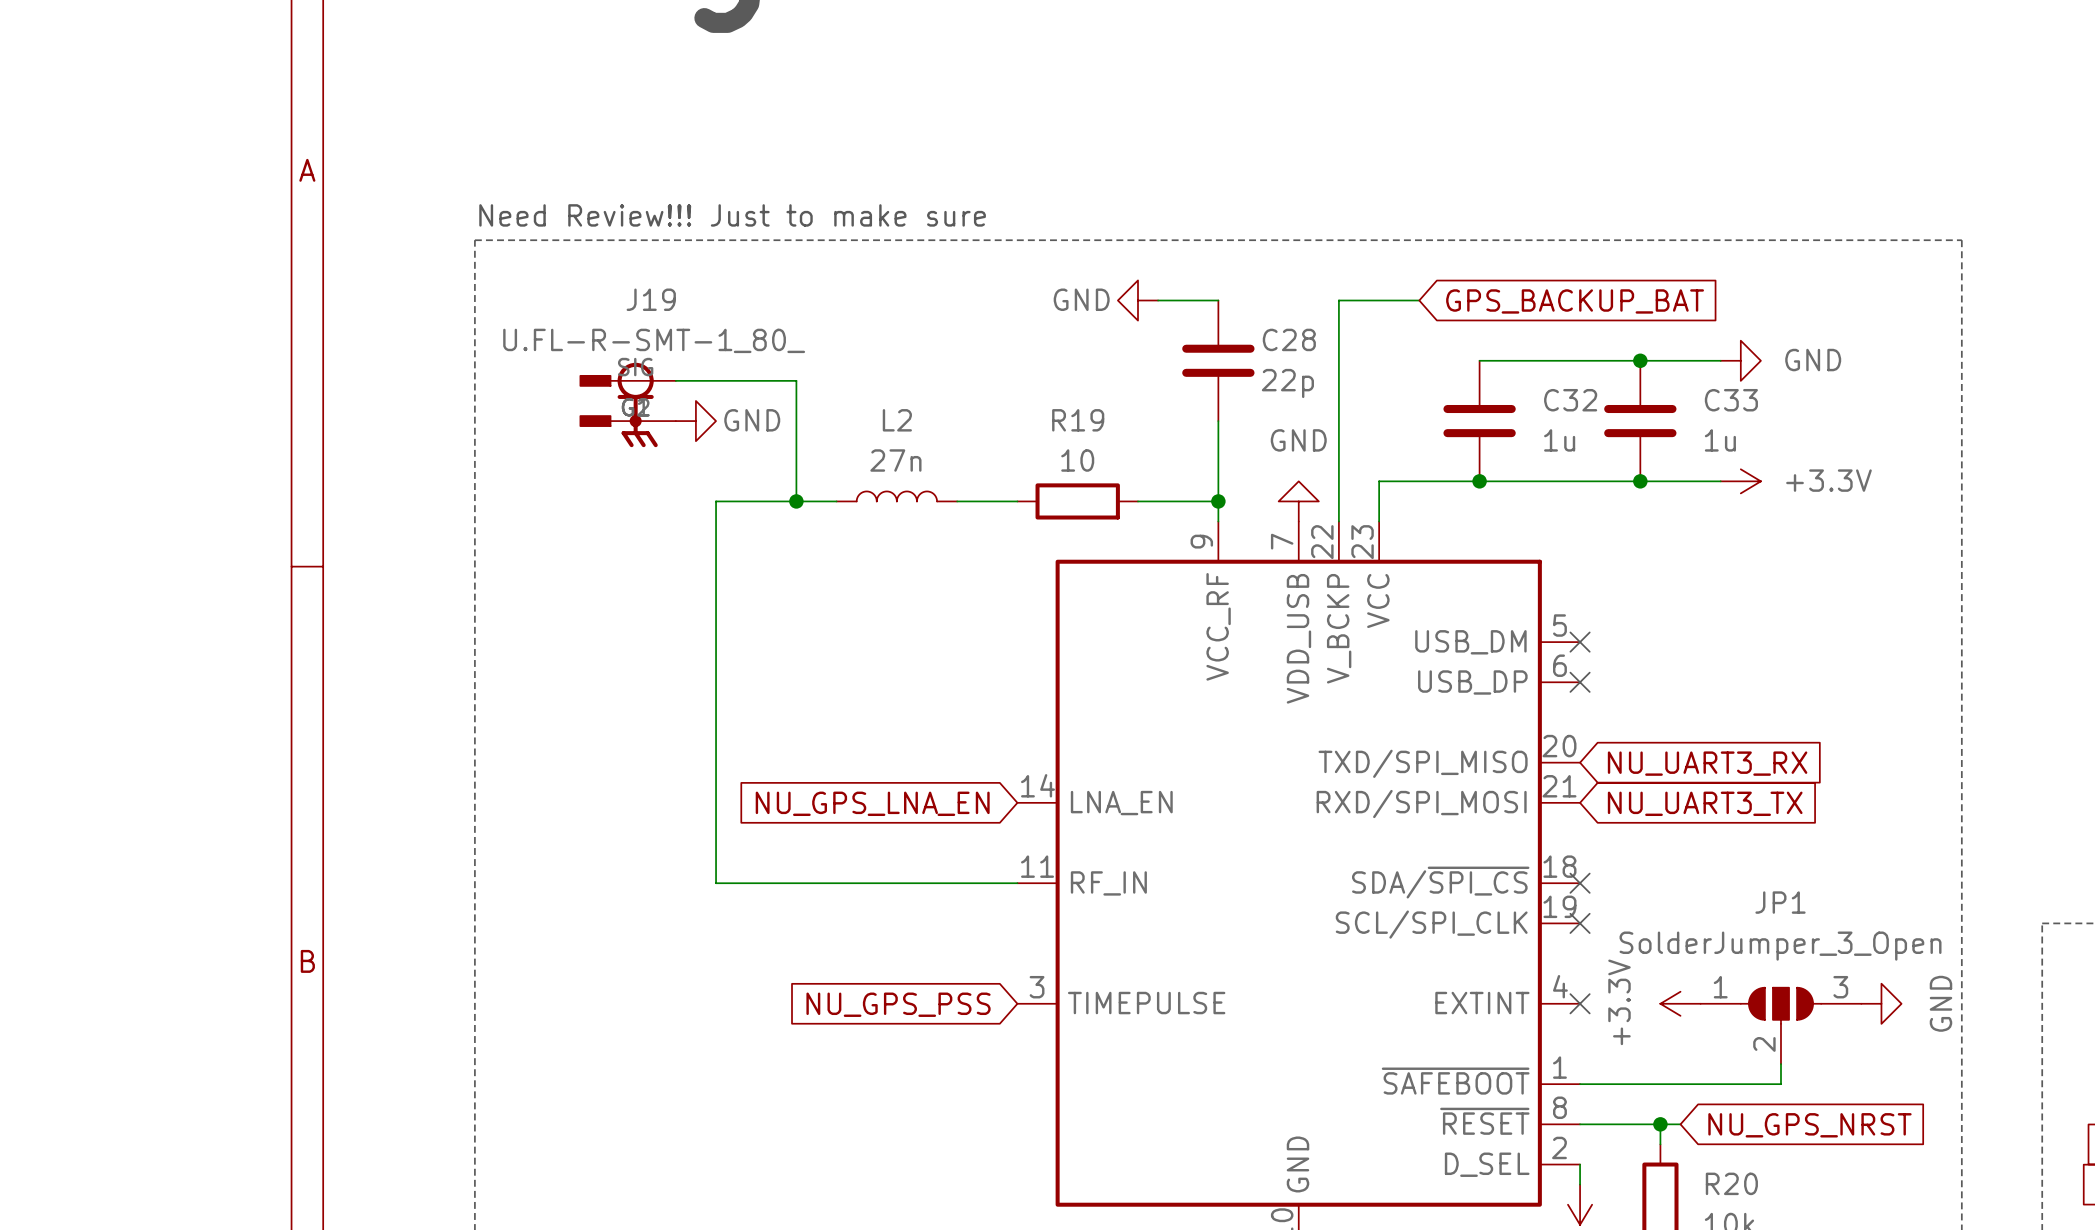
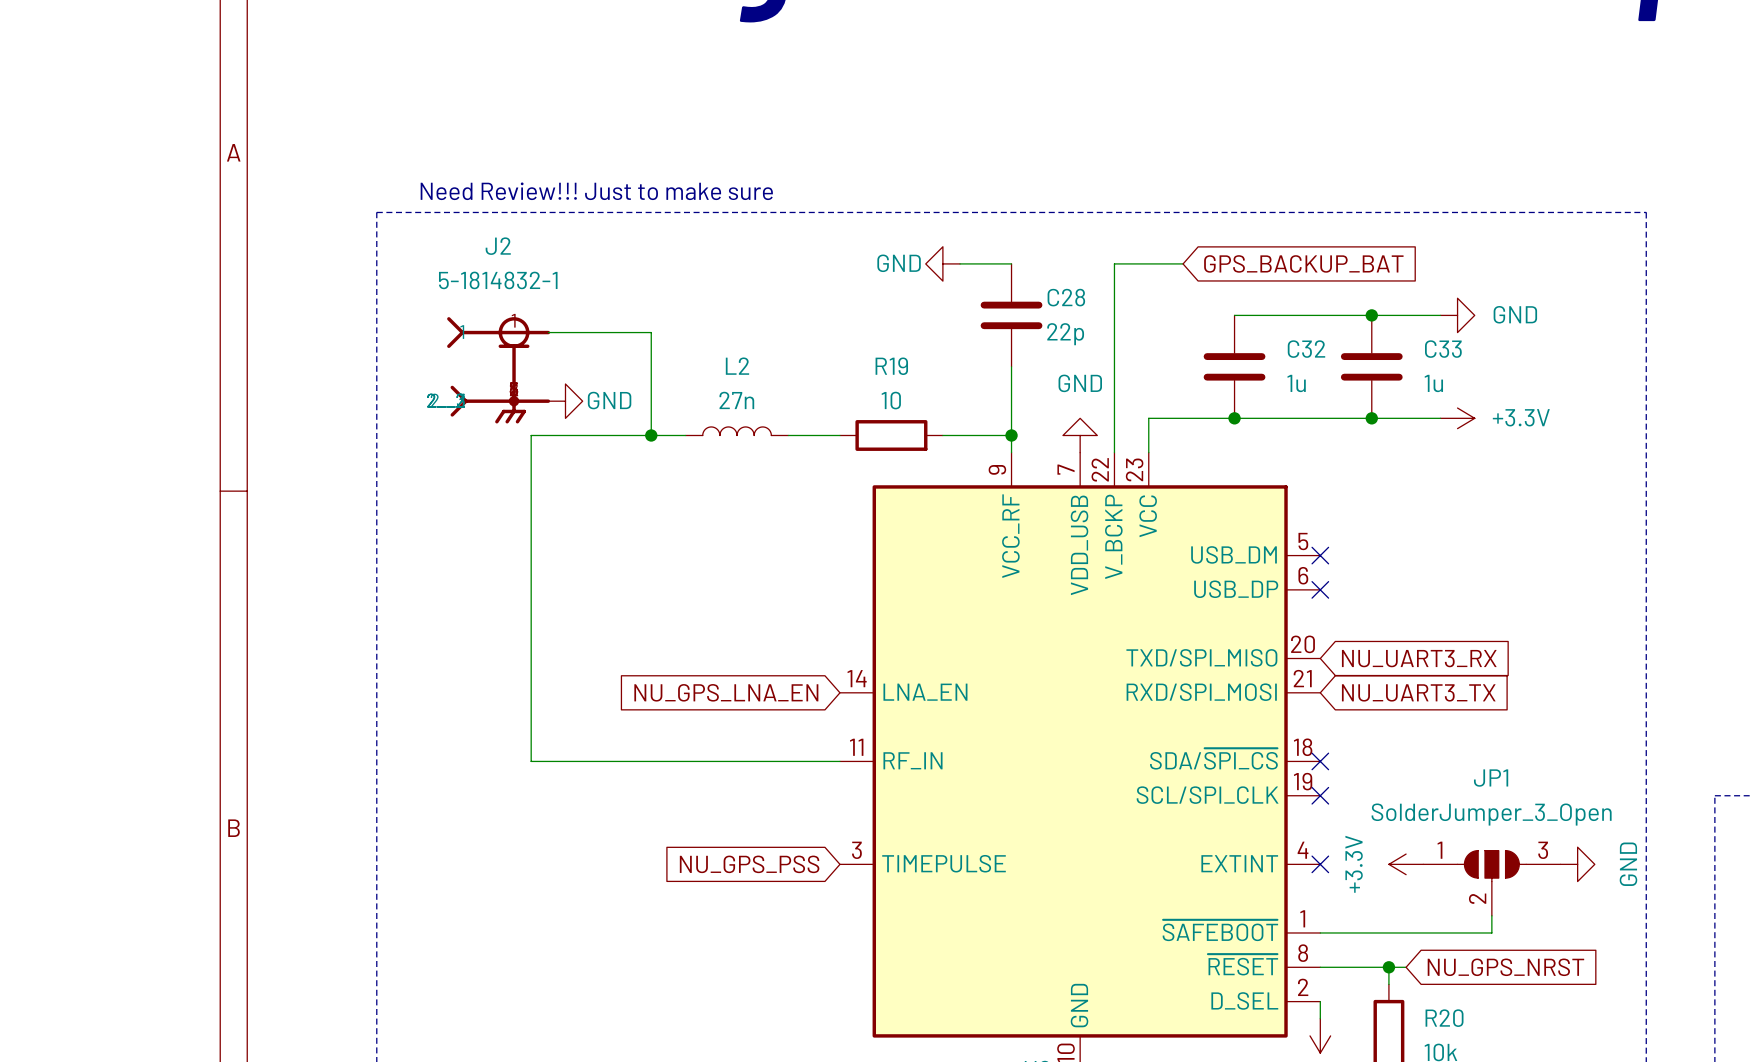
J19: U.FL-R-SMT-1_80_ (627, 404) -> none
power symbol position: GND (695, 421) -> GND (565, 401)
J2: none -> 5-1814832-1 (498, 370)
wire: (716, 501) (716, 883) -> (582, 435) (531, 435) (531, 761) (582, 761)

